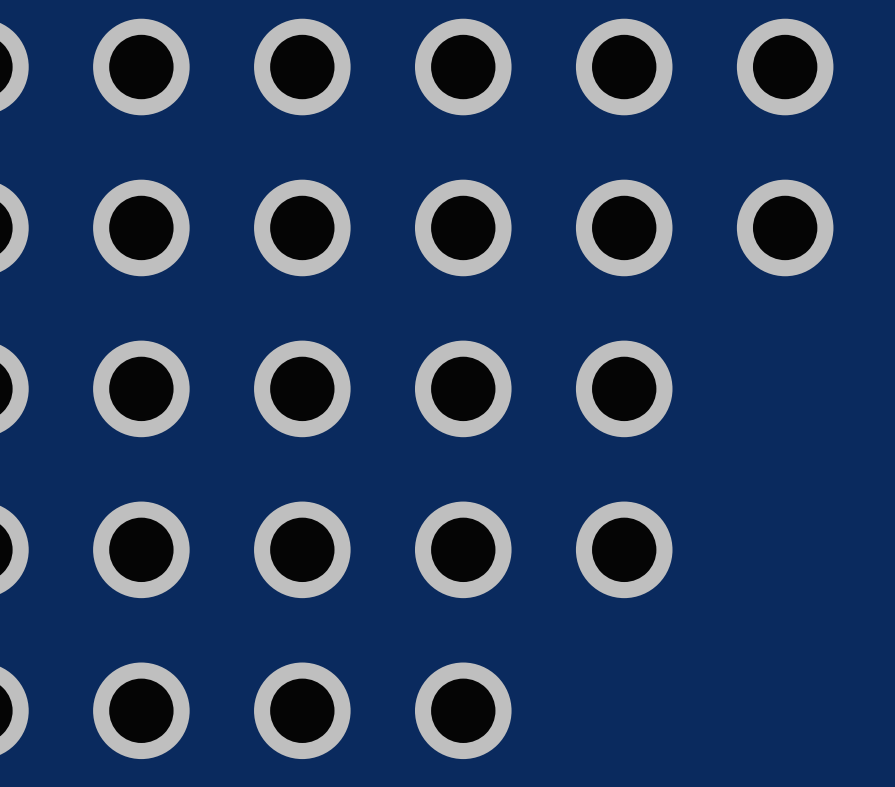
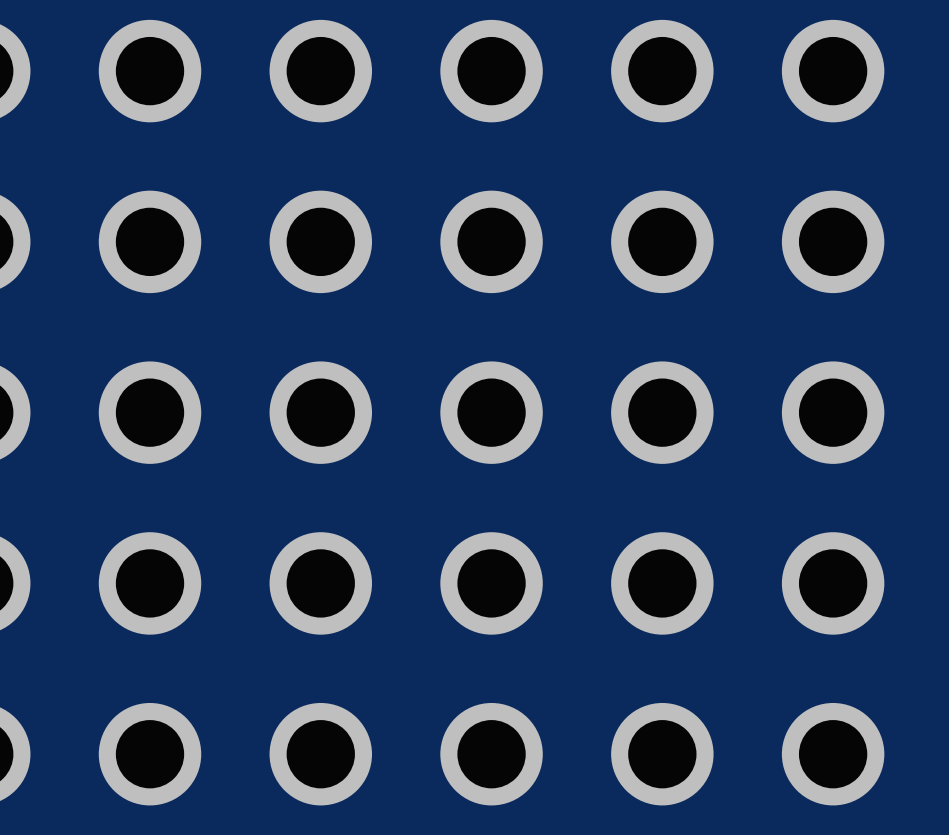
via: none -> (833, 412)
via: none -> (833, 583)
via: none -> (662, 754)
via: none -> (833, 754)

